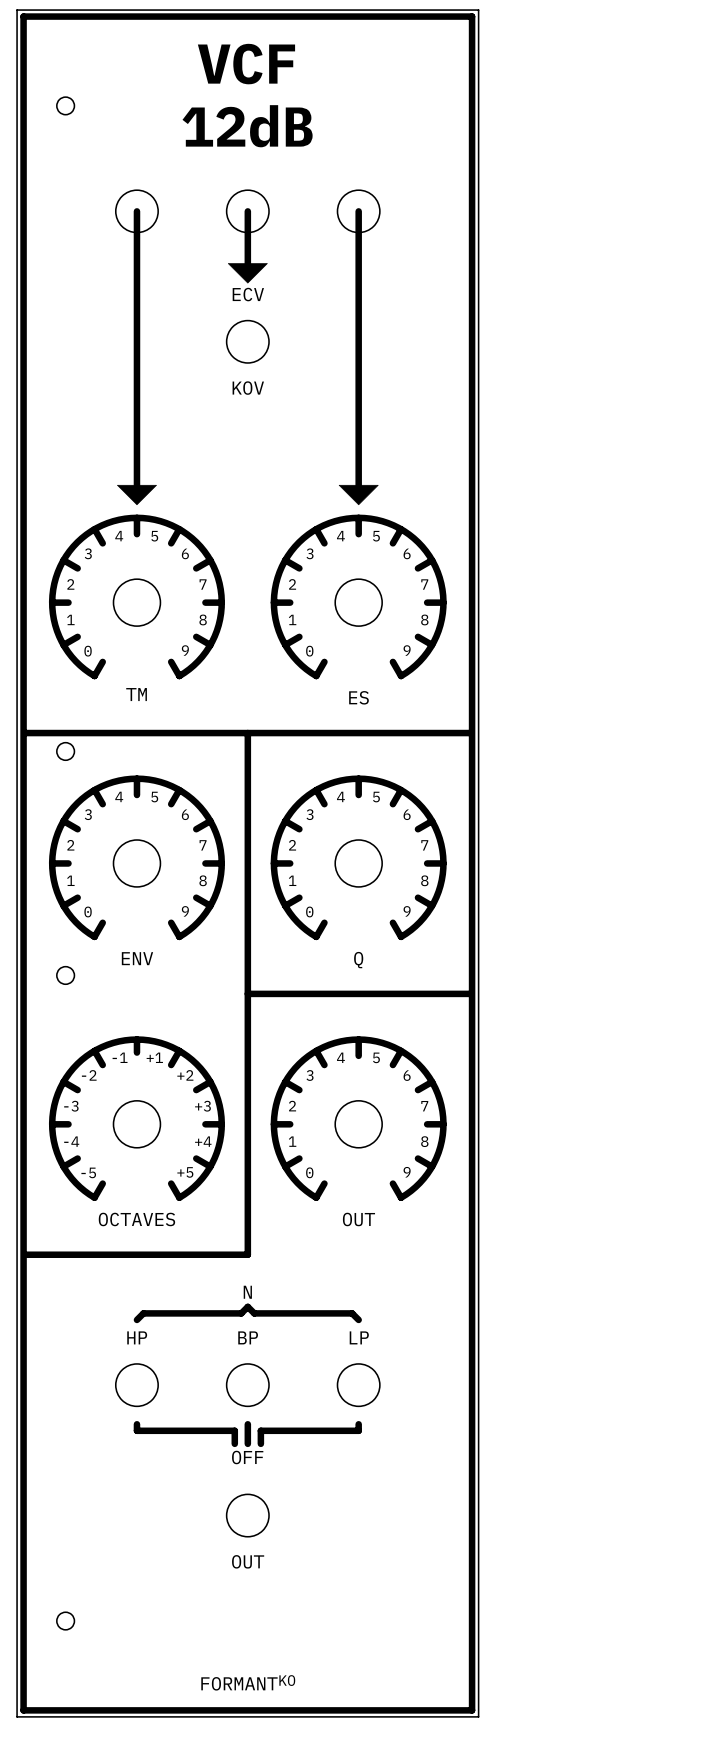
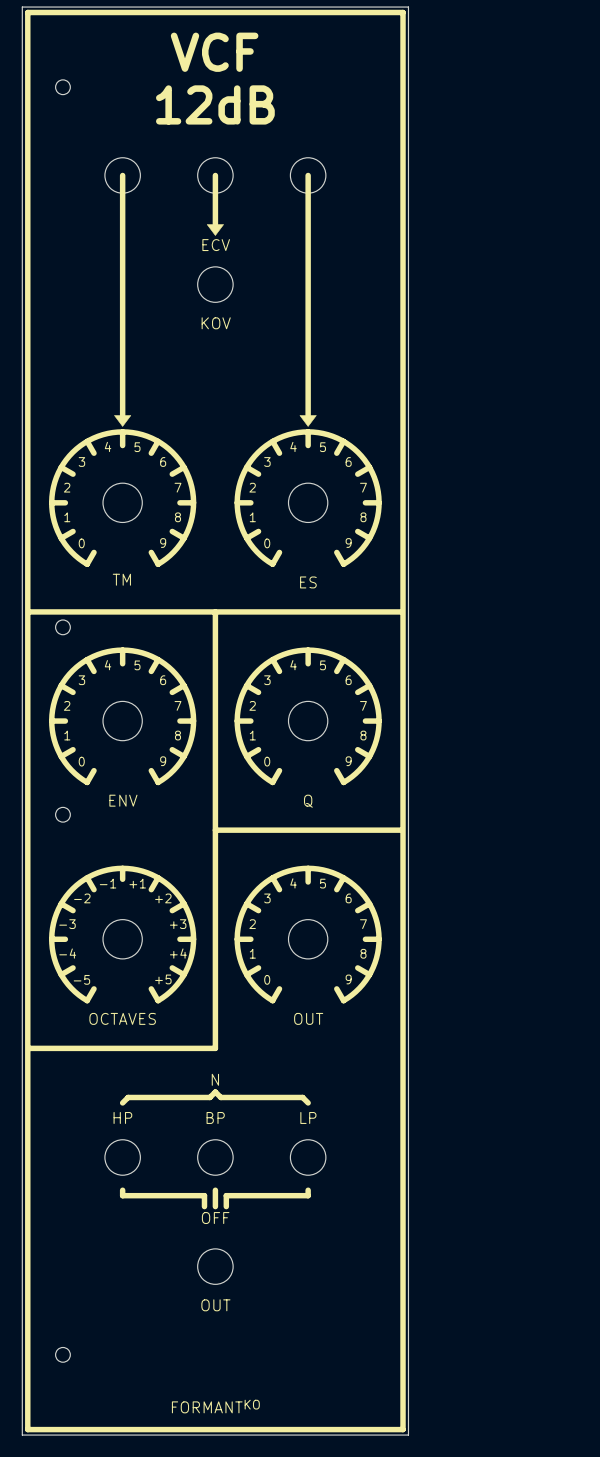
drawing shape: [227, 263, 268, 284] -> [206, 224, 224, 236]
drawing: [117, 484, 157, 506] -> none
drawing: [338, 484, 379, 506] -> none
drawing: none -> [114, 415, 132, 427]
drawing: none -> [299, 415, 317, 427]

